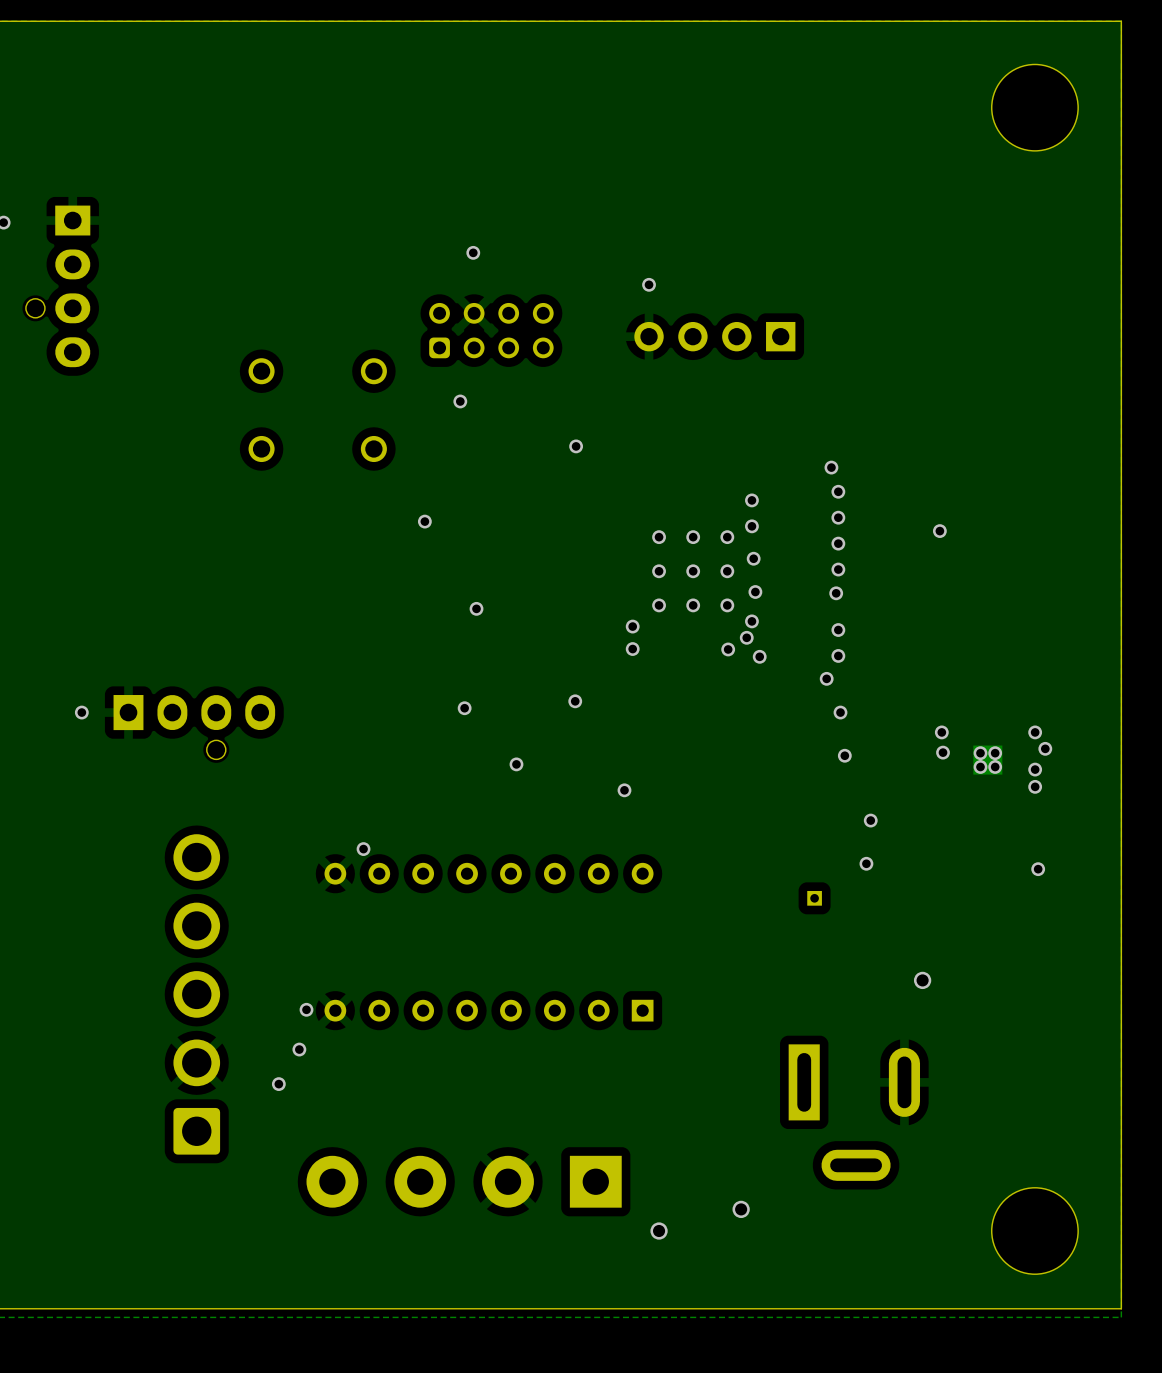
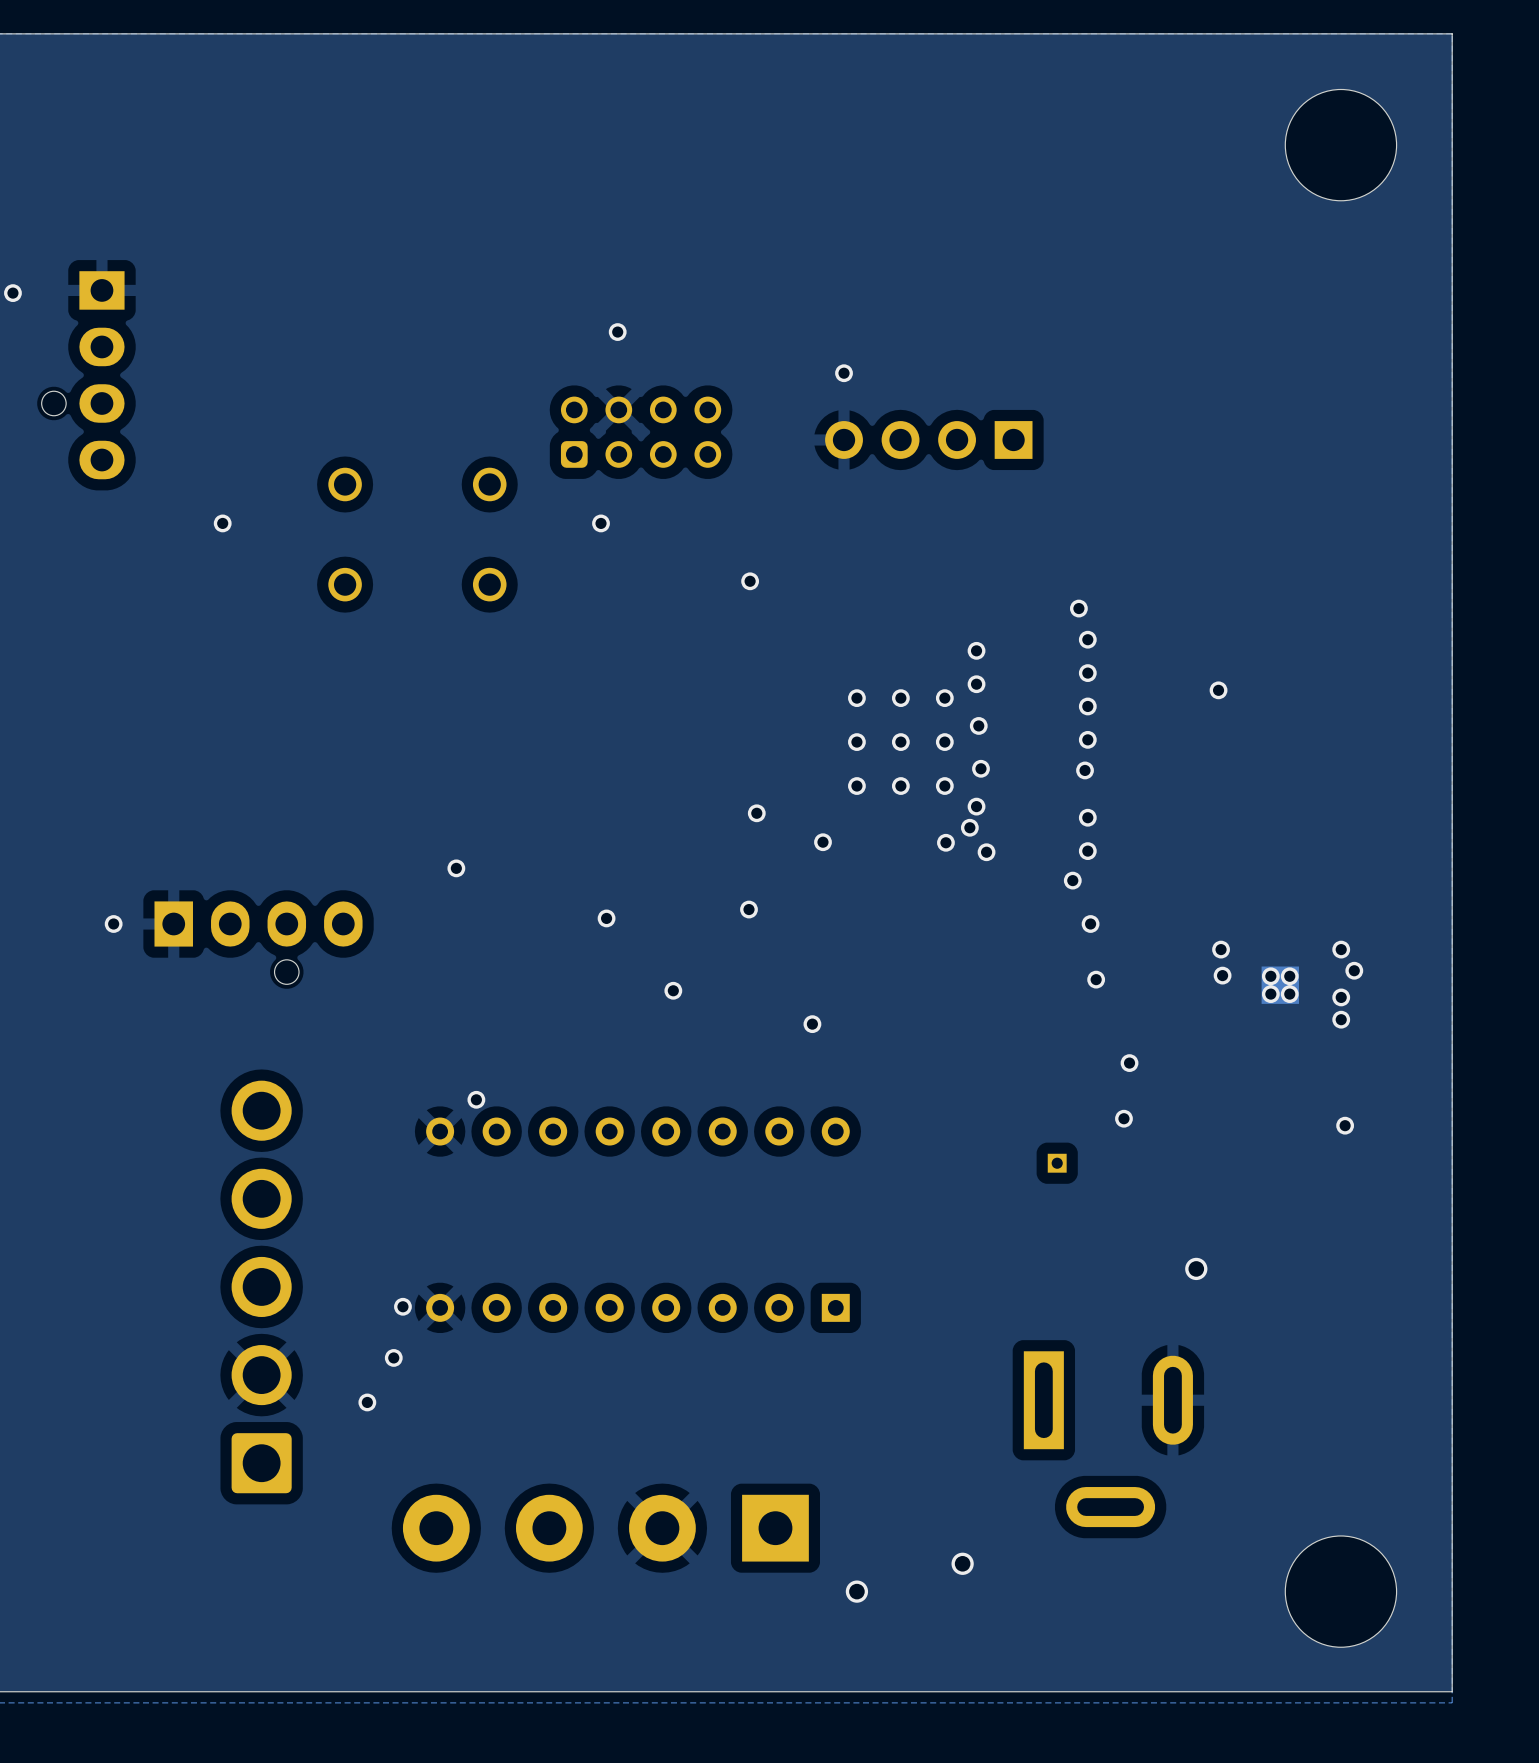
via: none -> (222, 523)
via: (424, 521) -> none
via: (476, 608) -> none
via position: (632, 626) -> (756, 813)
via: none -> (456, 868)

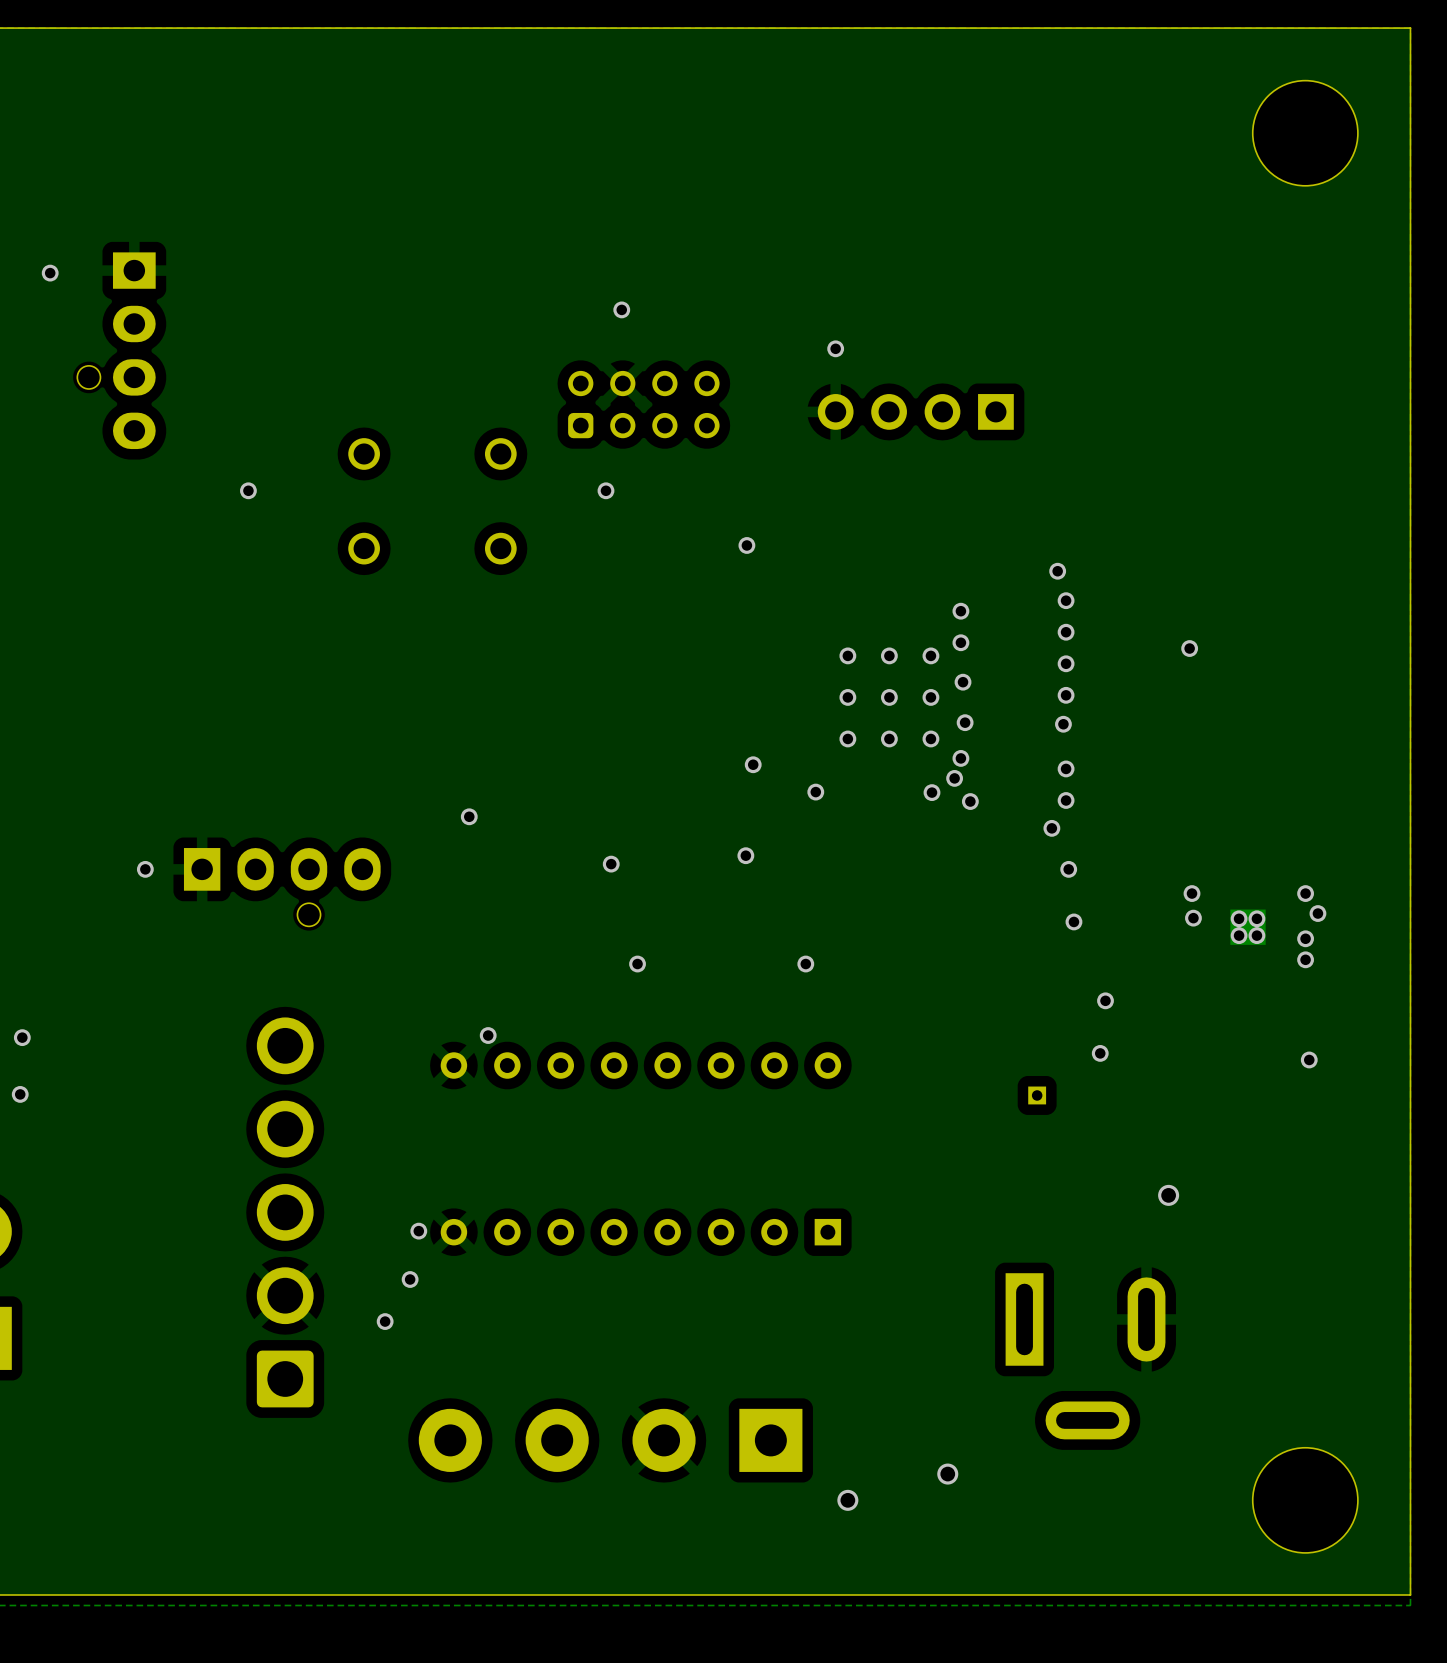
via position: (673, 990) -> (637, 964)

